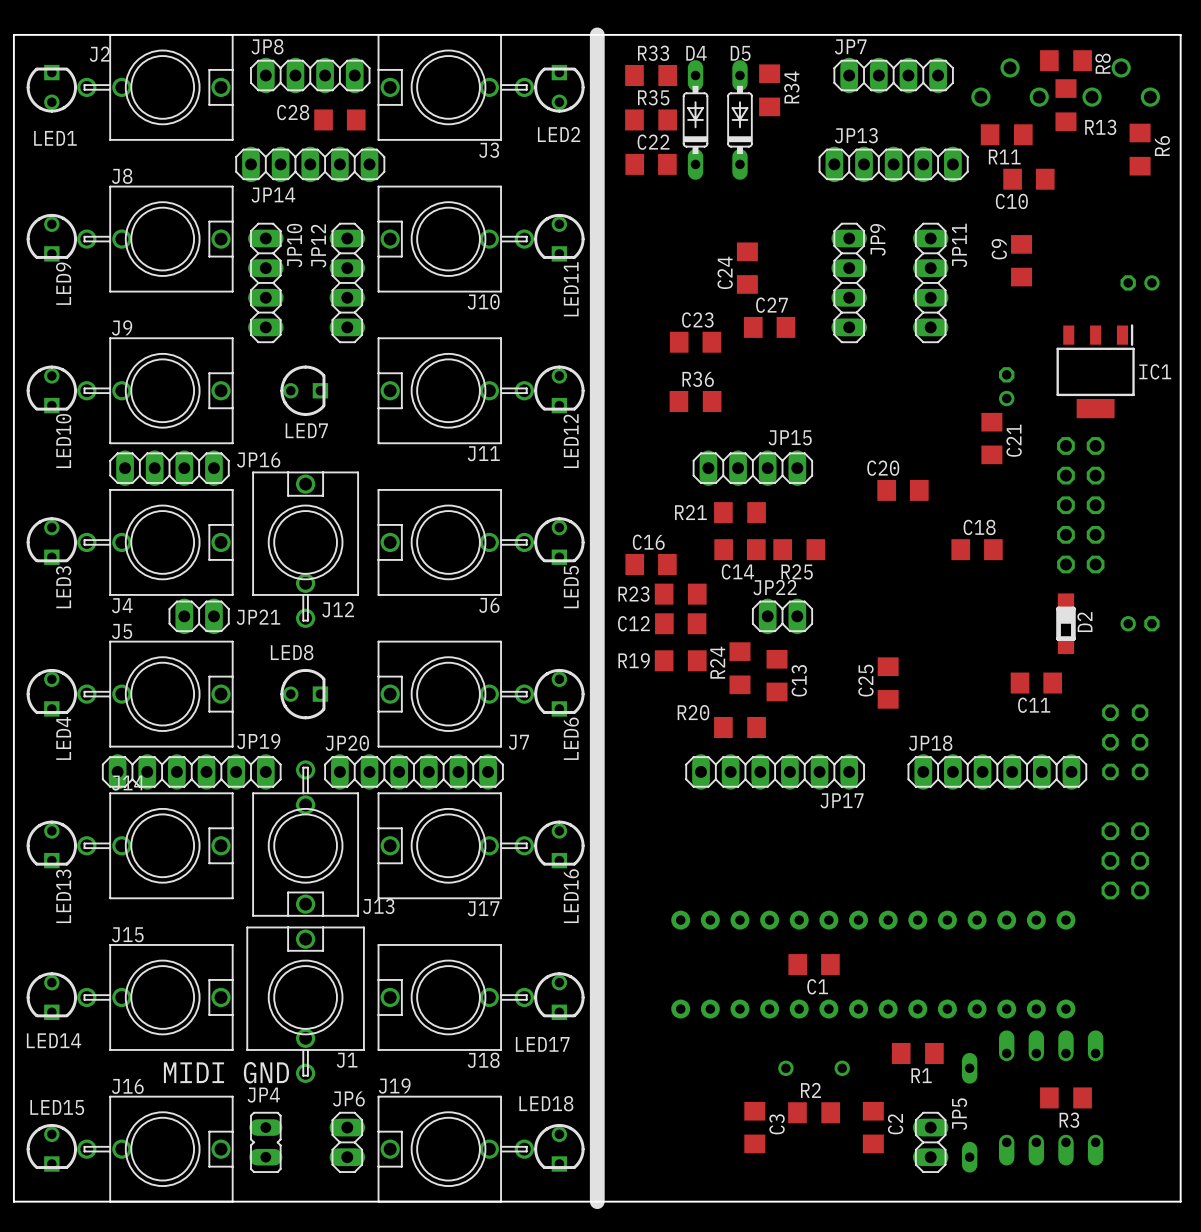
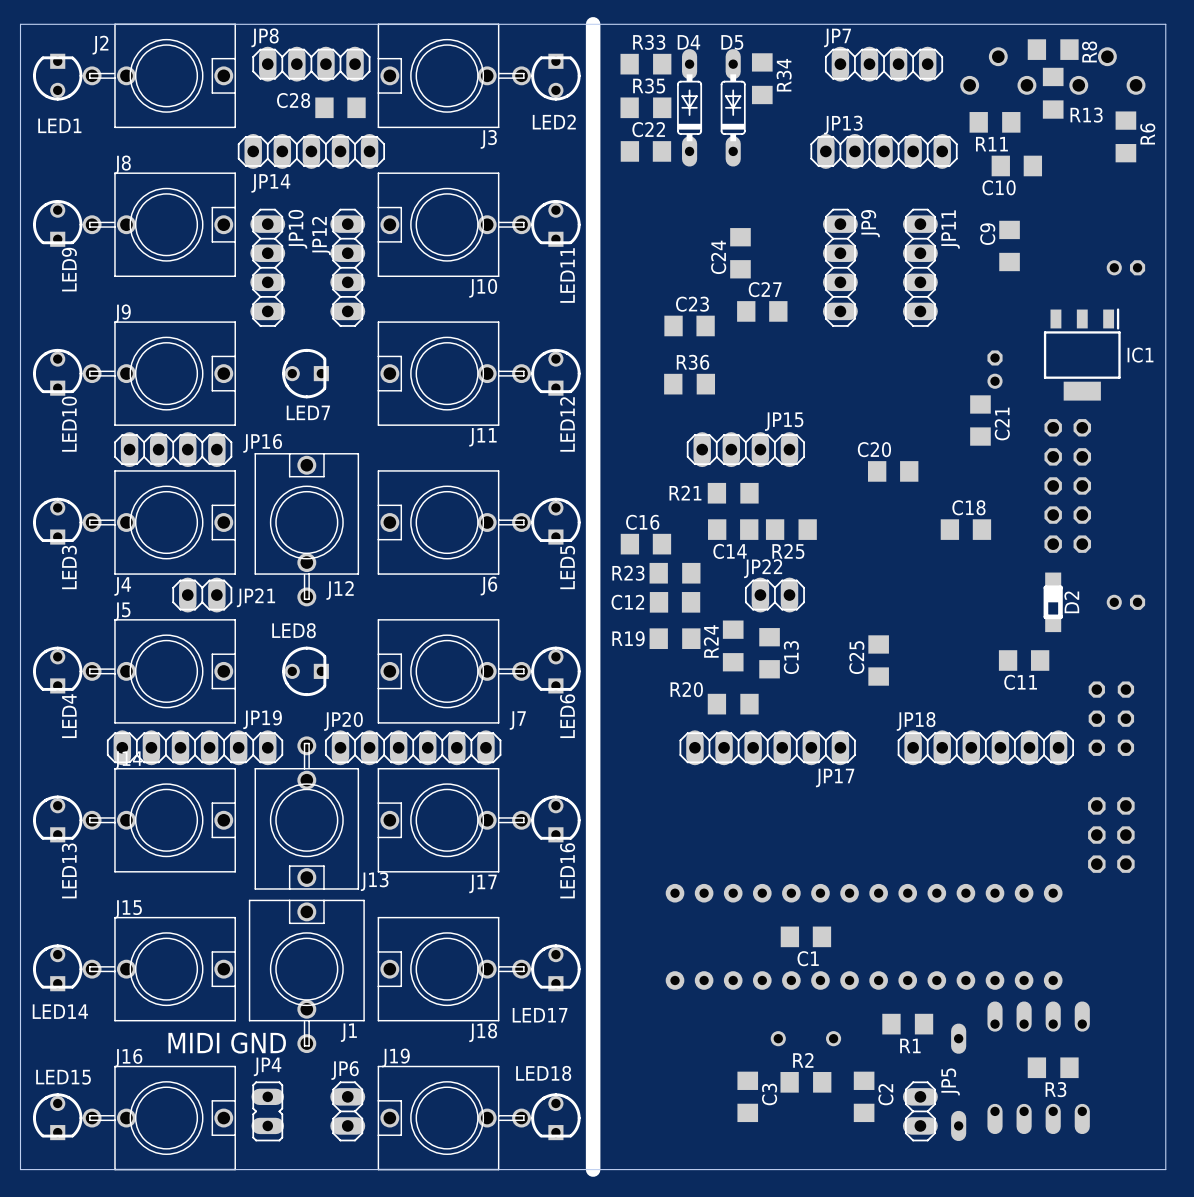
part rotation: 0° (1140, 282) -> 180° (1125, 267)

